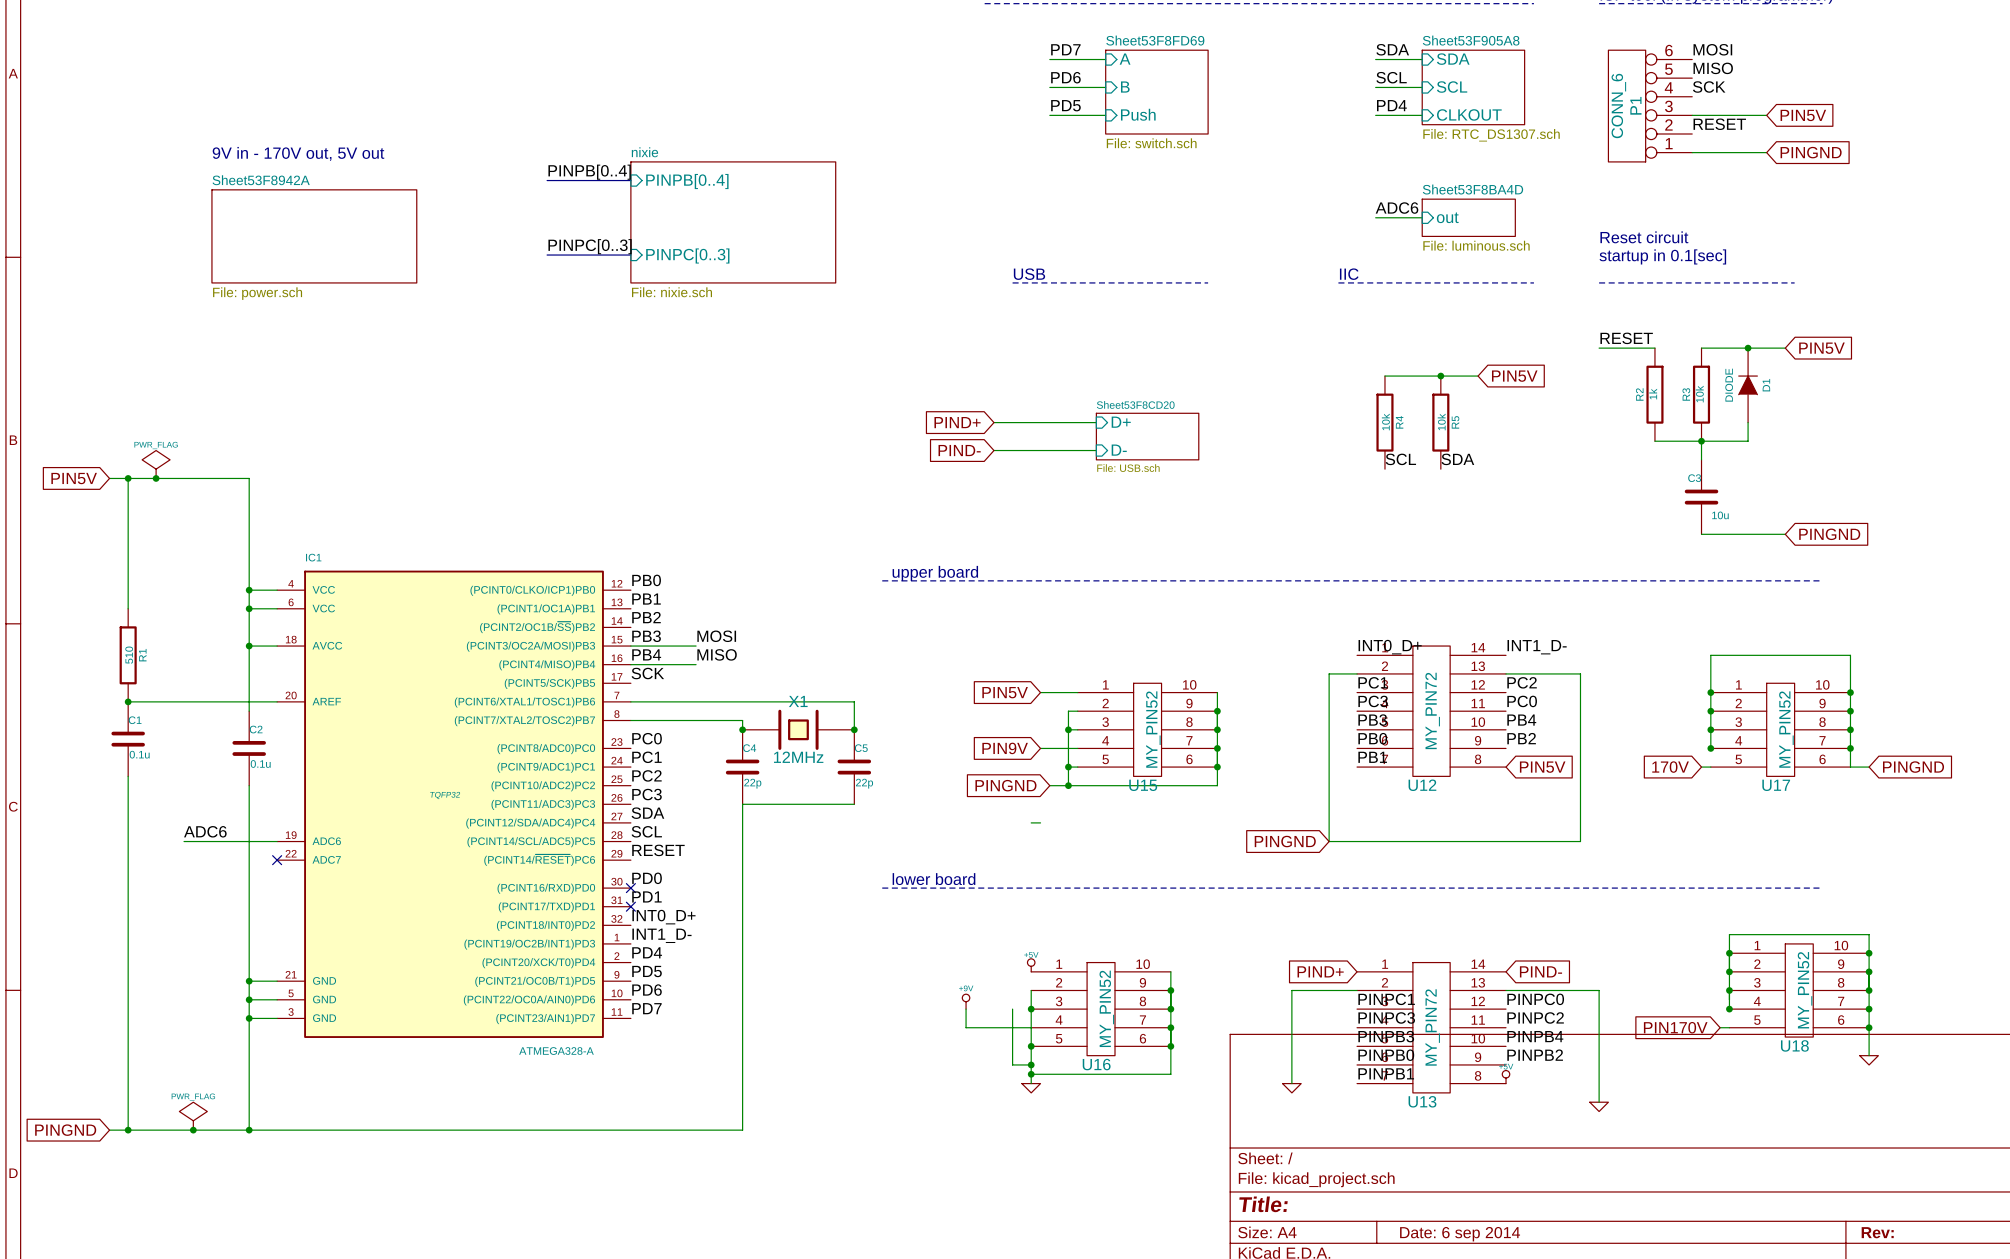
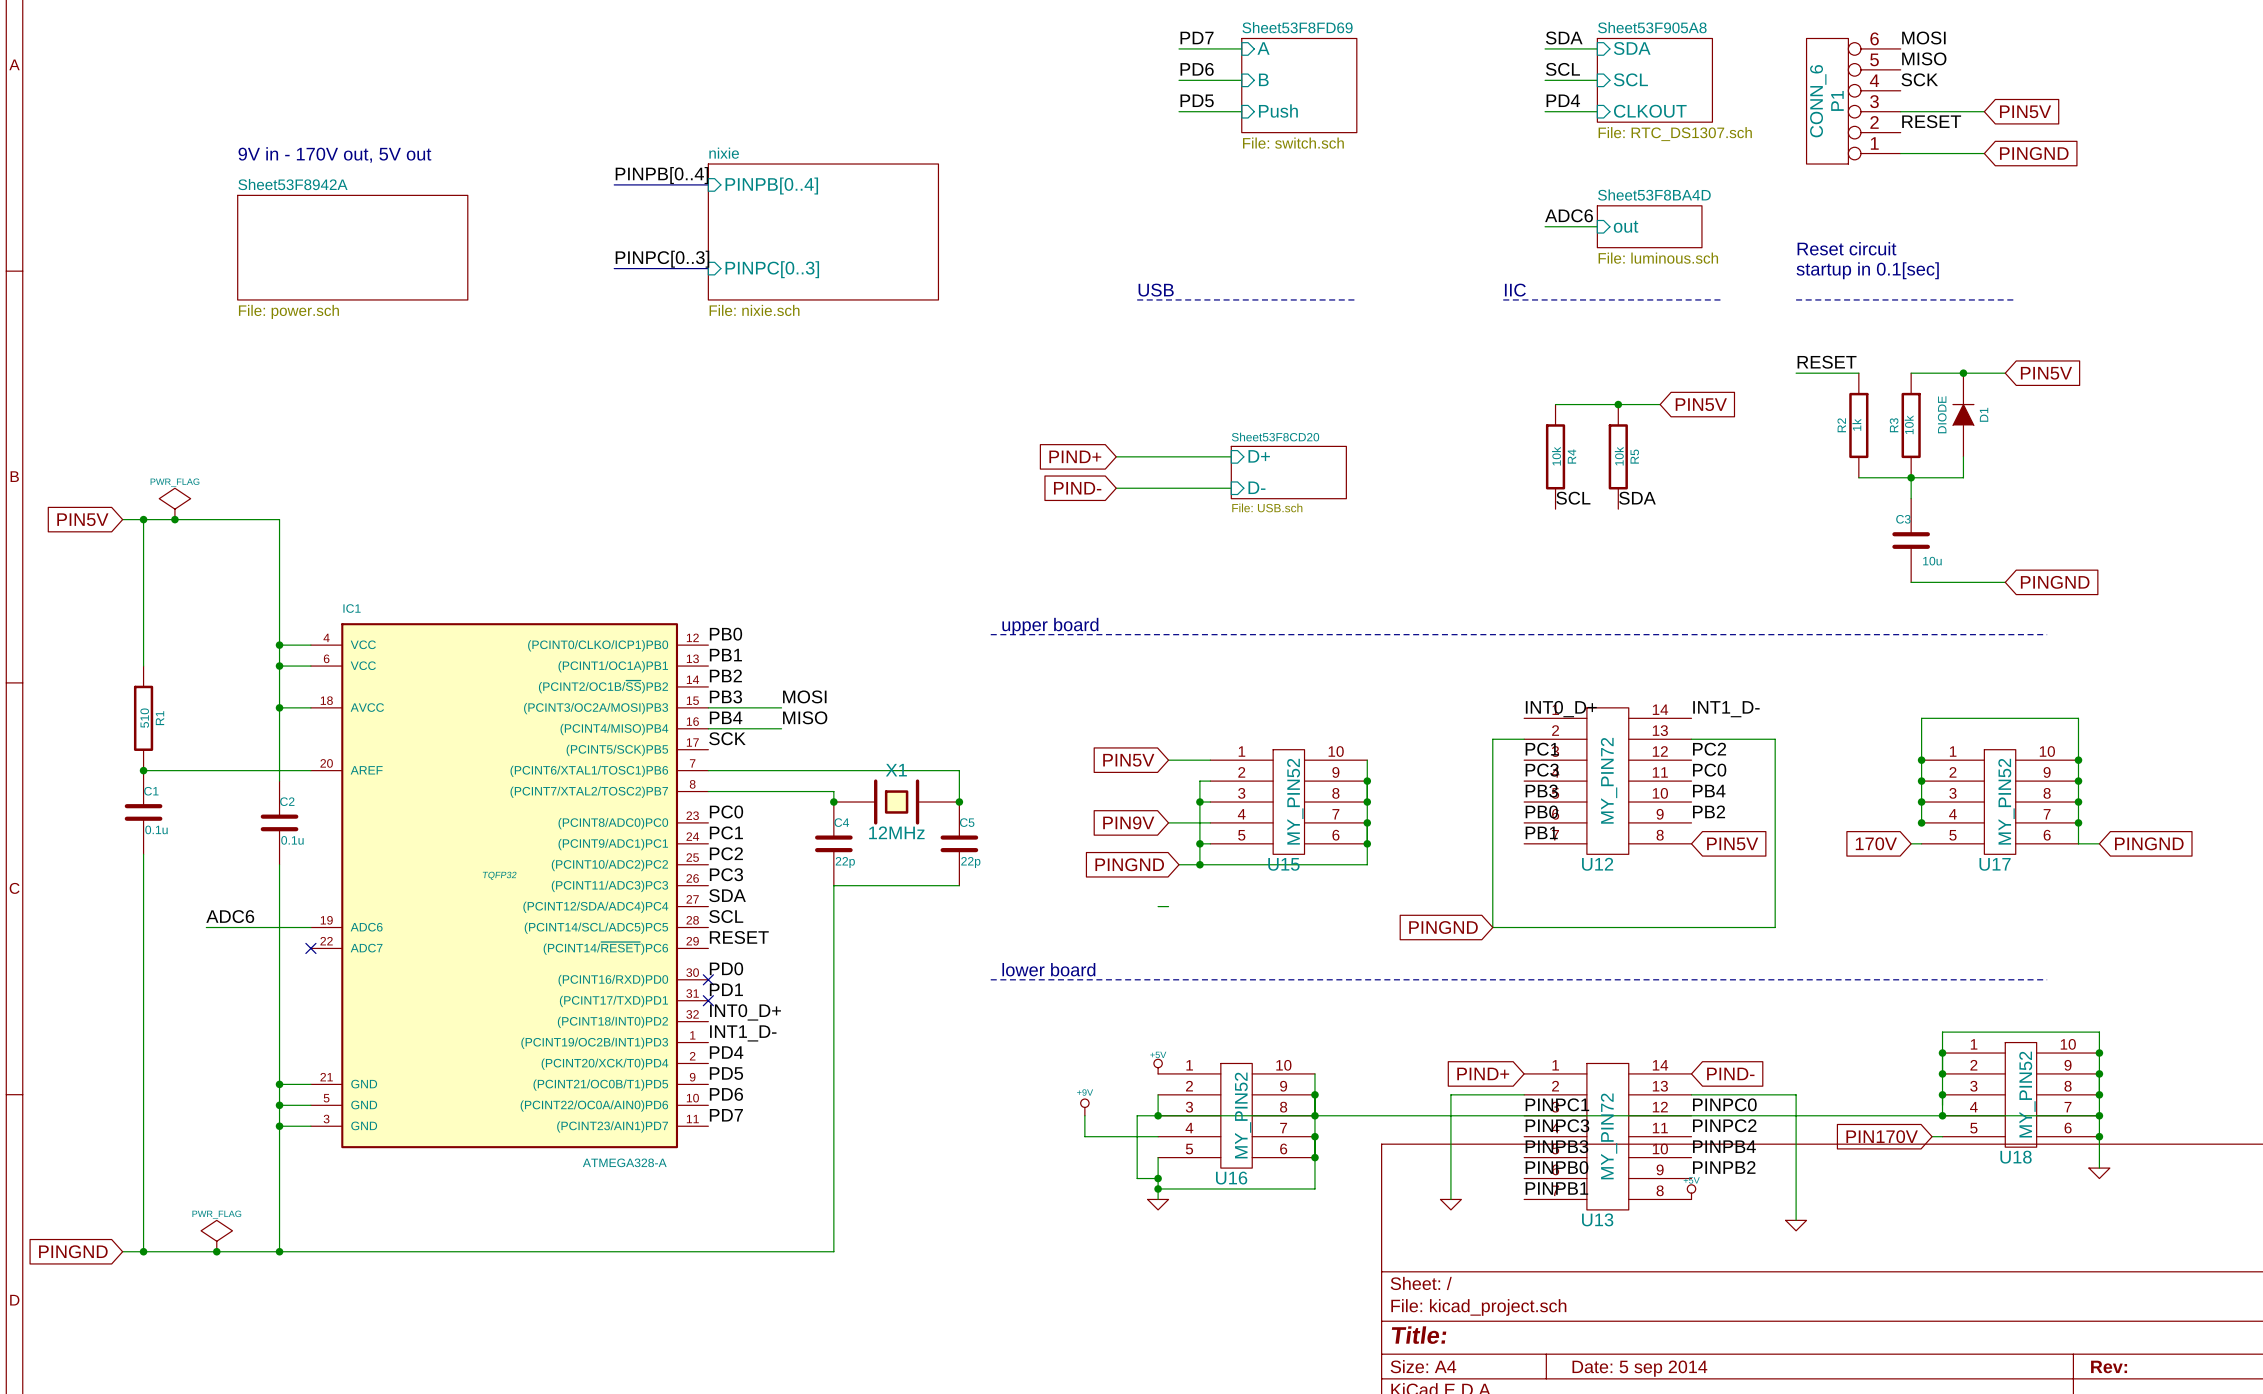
wire: none -> (1137, 1115) (2099, 1115)
wire: (1031, 1009) (1031, 1046) -> none
junction: (1031, 1046) -> none
title block: Date: 6 sep 2014 (1460, 1234) -> Date: 5 sep 2014 (1639, 1368)

